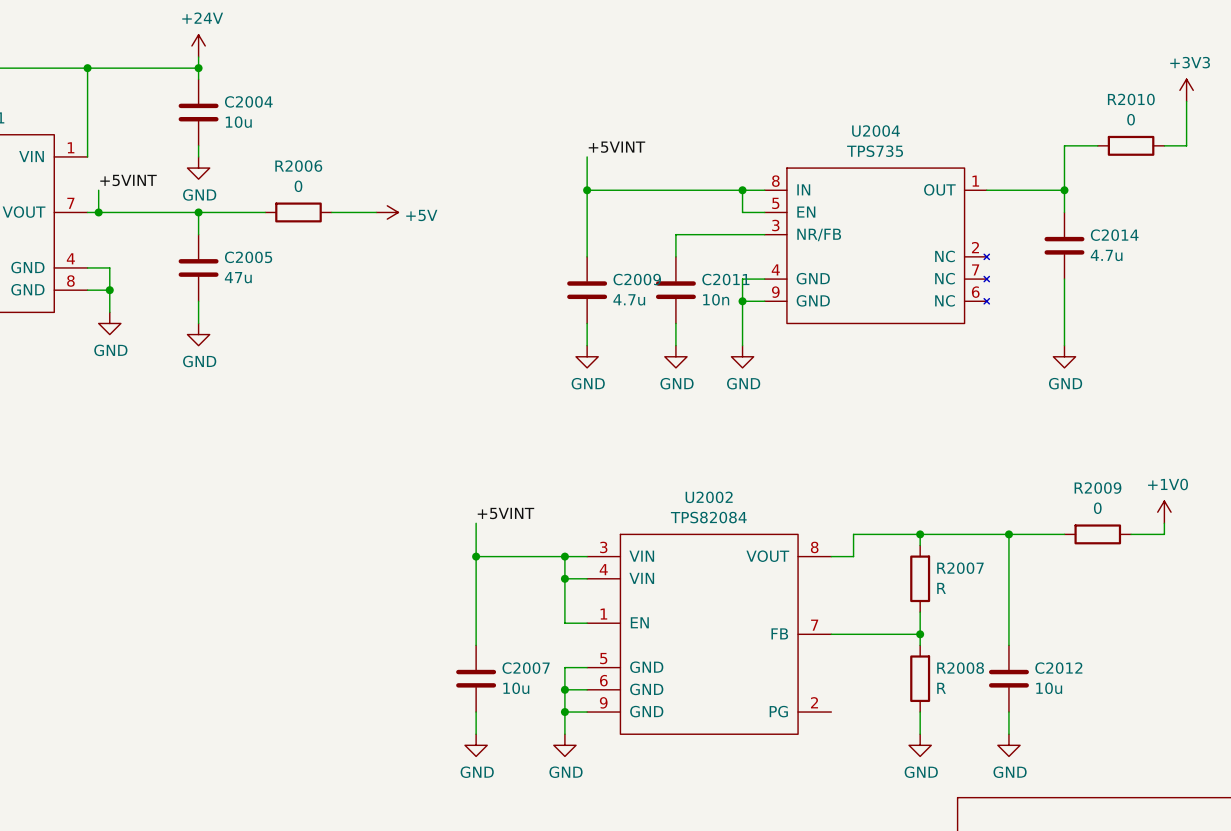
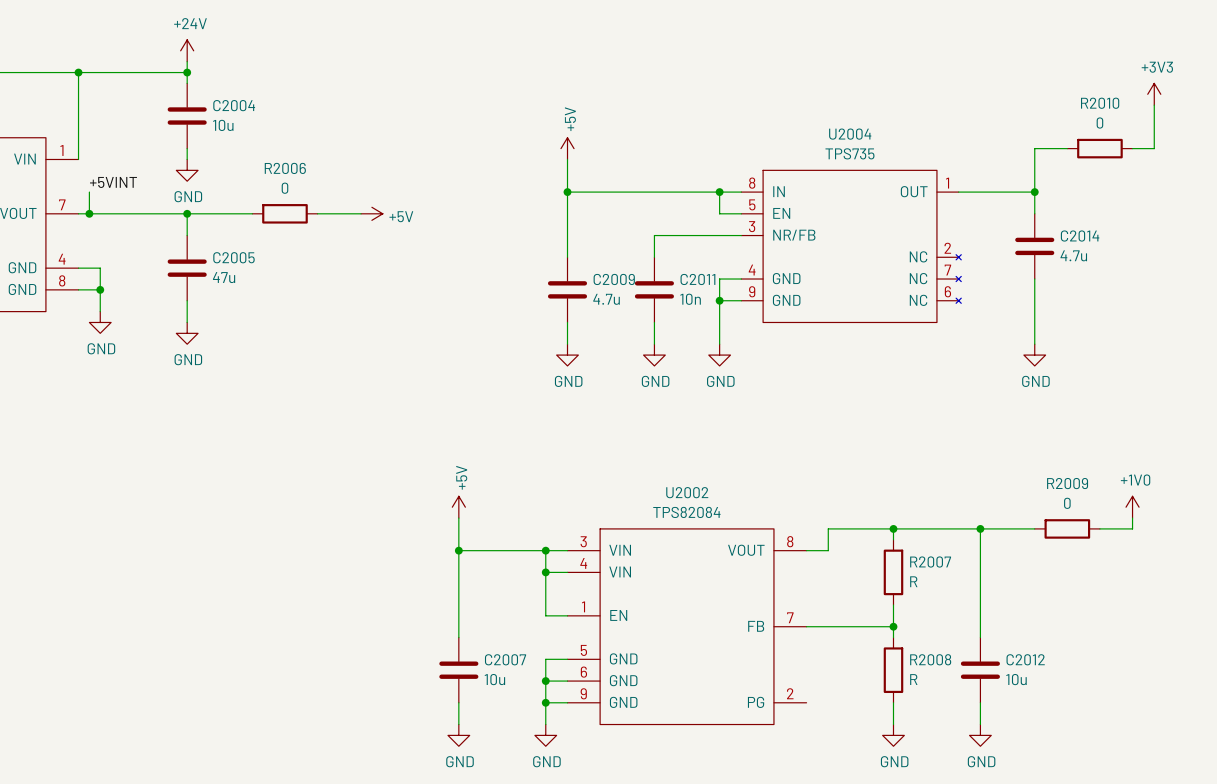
power symbol: none -> +5V (567, 148)
label: +5VINT (616, 147) -> none
power symbol: none -> +5V (458, 507)
label: +5VINT (505, 513) -> none

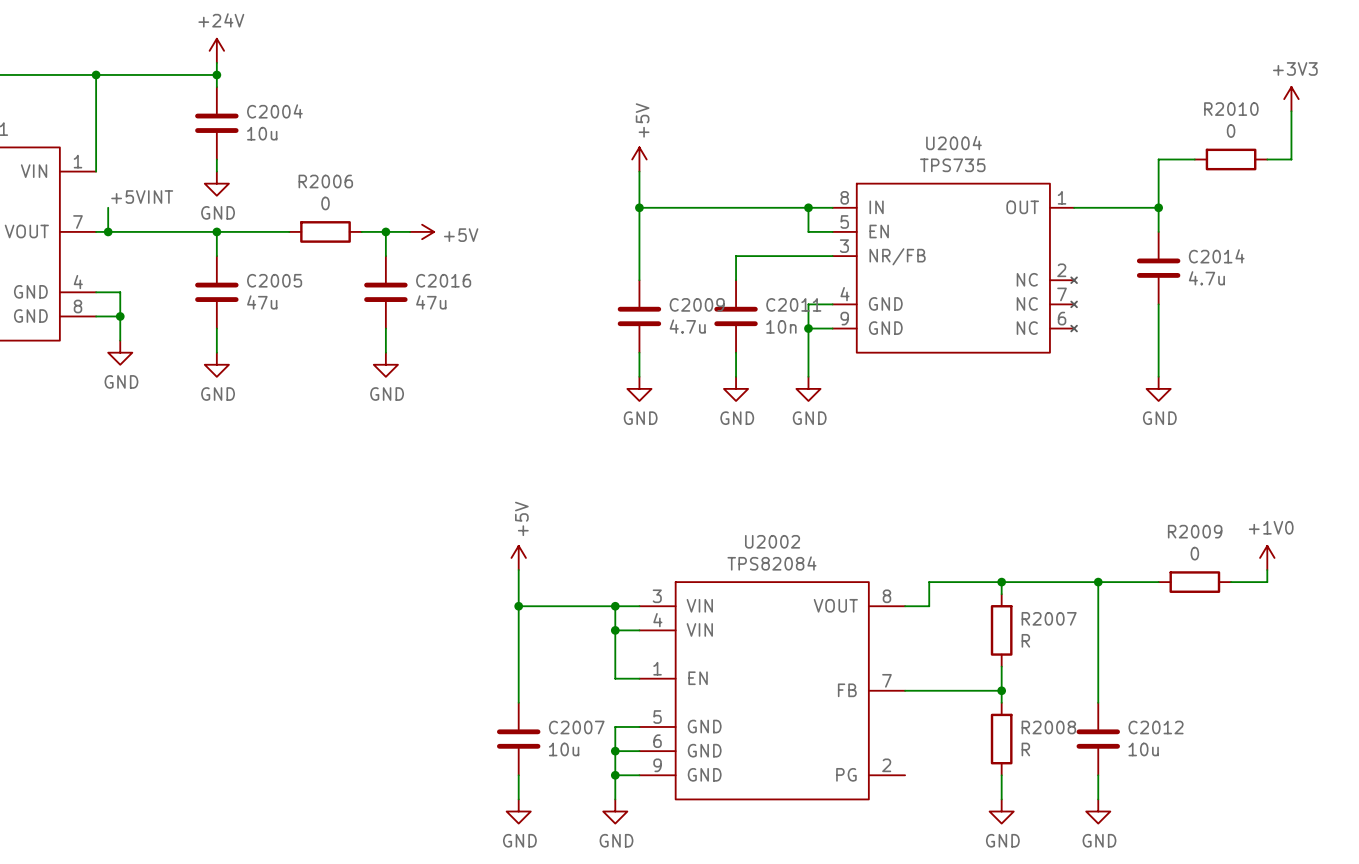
wire: none -> (385, 231) (385, 256)
junction: none -> (385, 231)
C2016: none -> 47u (385, 292)
wire: none -> (385, 328) (385, 352)
power symbol: none -> GND (385, 364)

